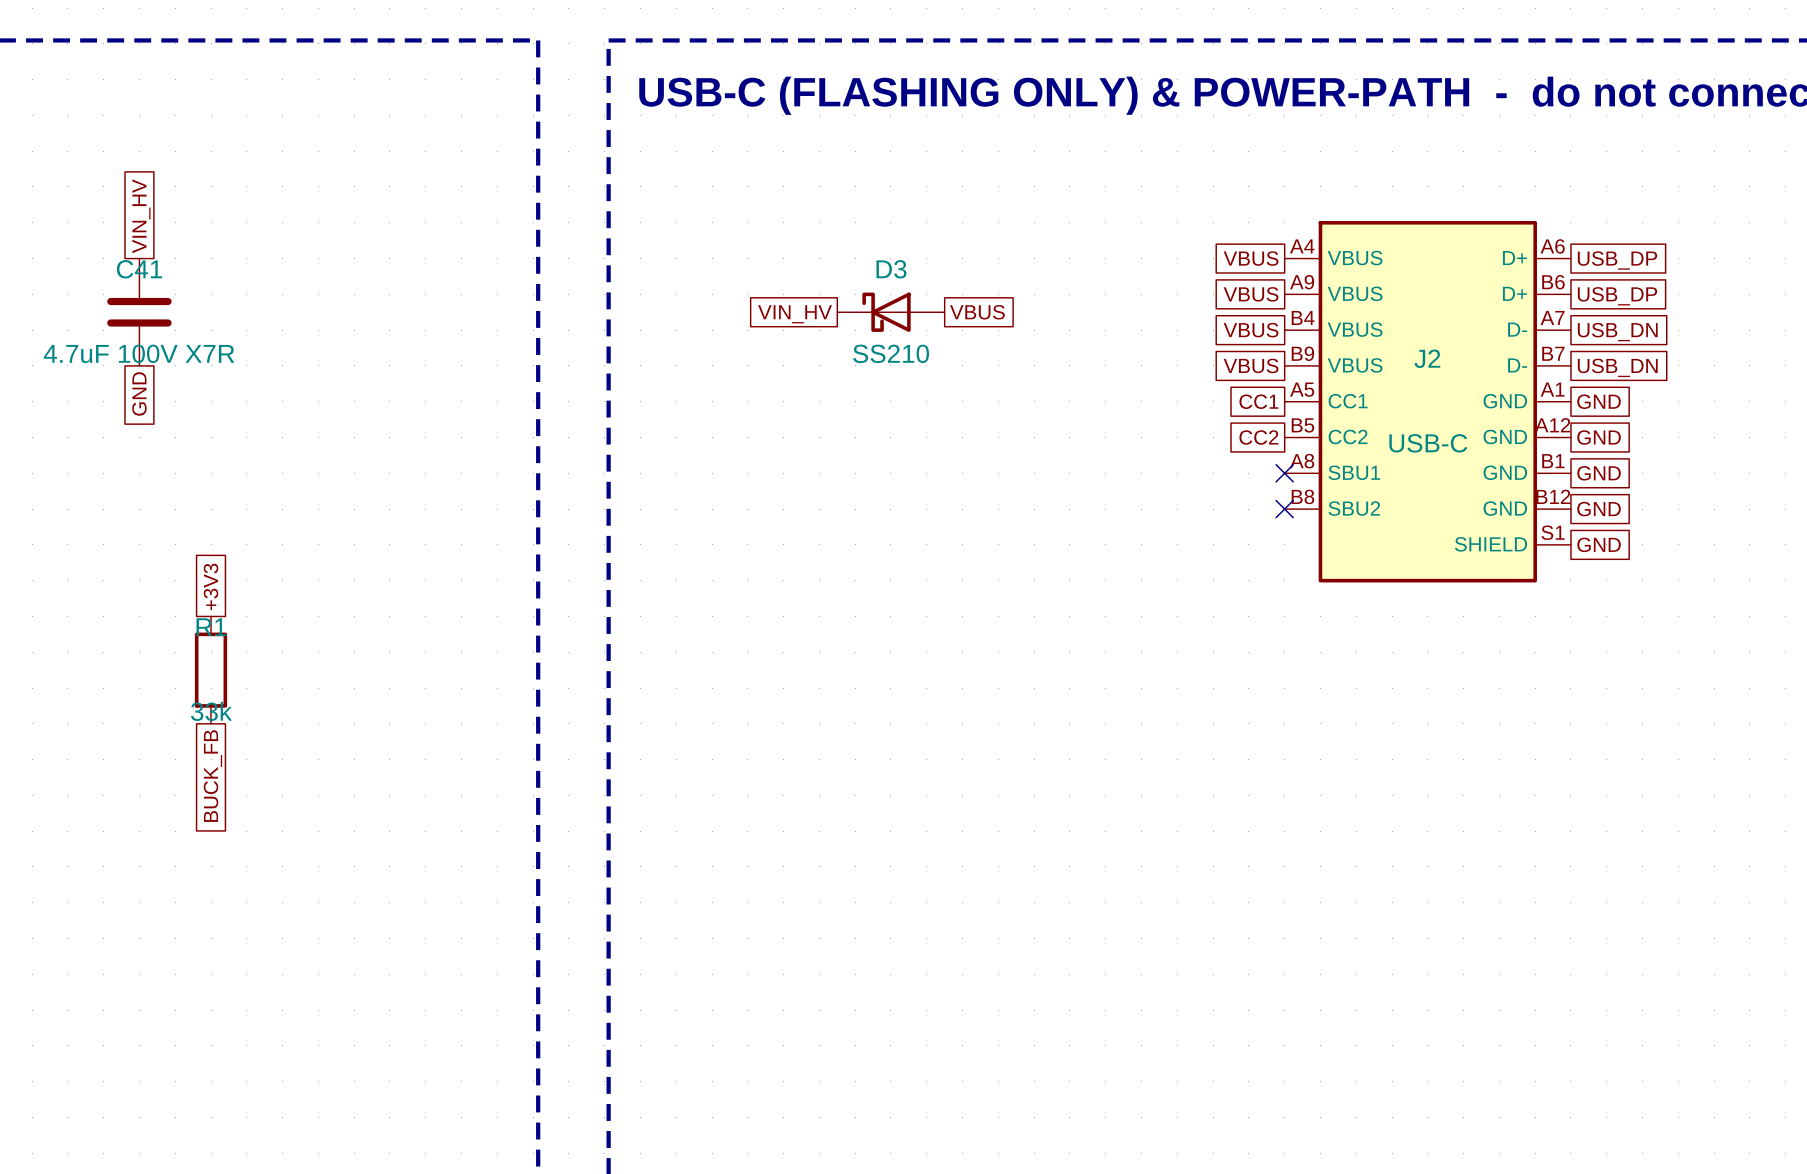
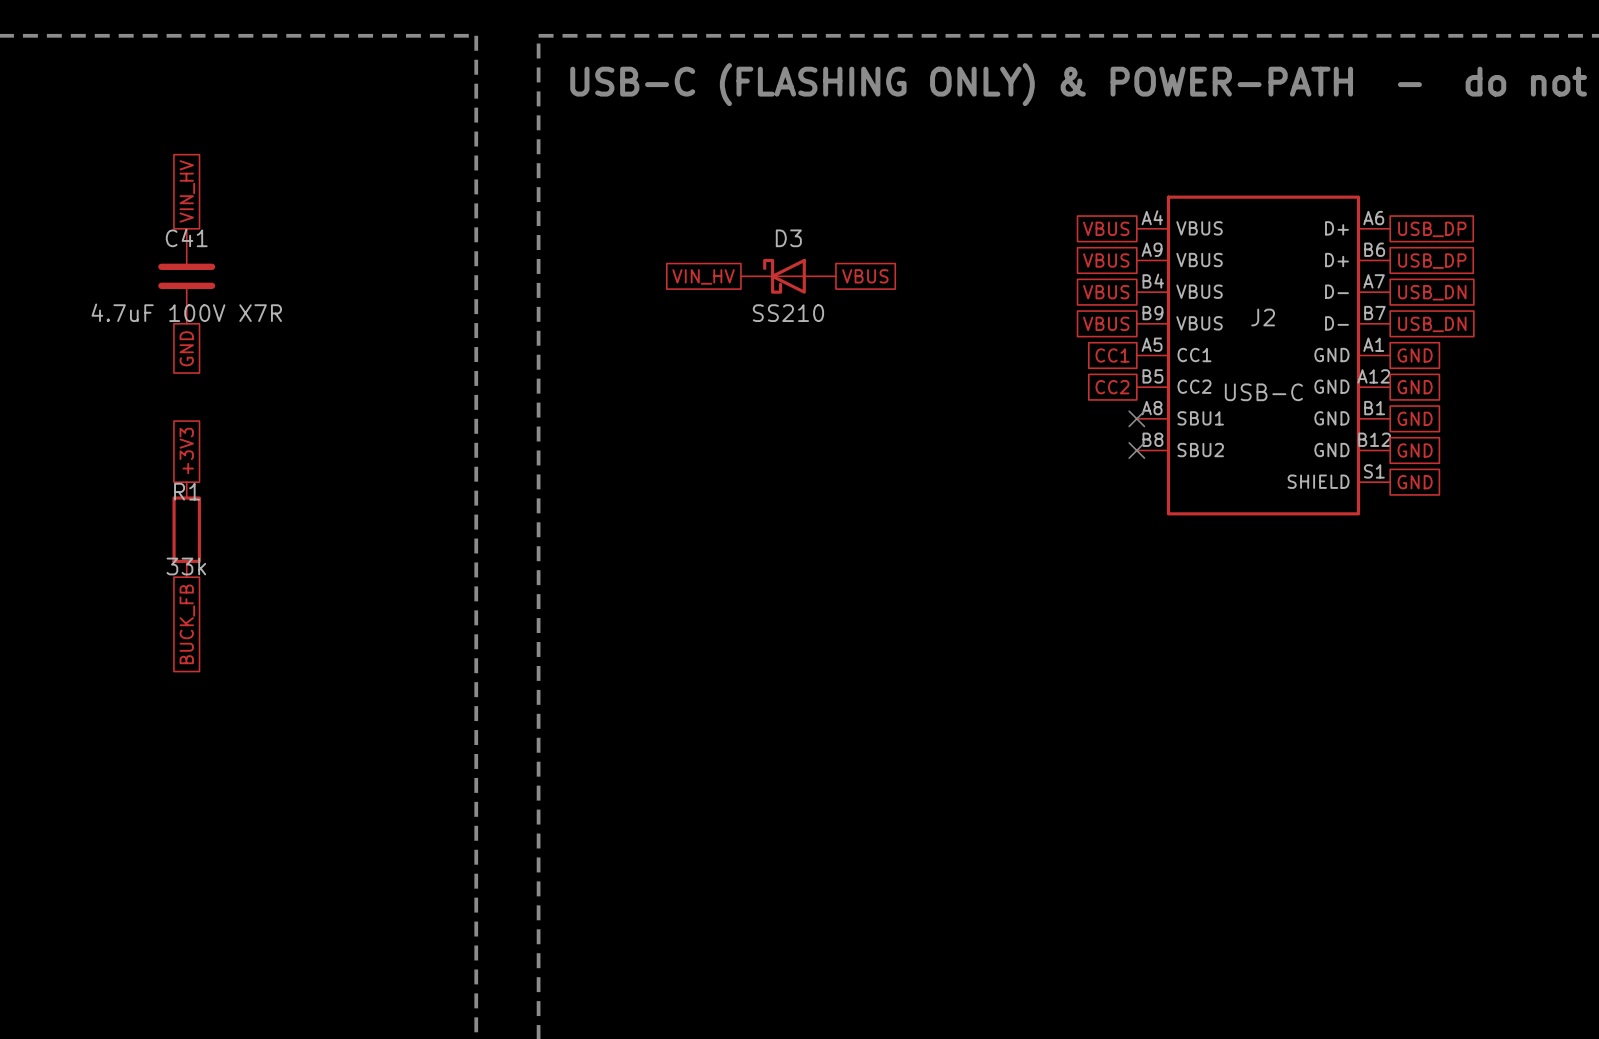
global label position: VIN_HV (141, 216) -> VIN_HV (187, 191)
C41 position: (139, 312) -> (186, 276)
global label position: GND (139, 393) -> GND (186, 348)
global label position: +3V3 (211, 586) -> +3V3 (186, 451)
R1 position: (211, 670) -> (186, 529)
global label position: BUCK_FB (212, 776) -> BUCK_FB (187, 624)

